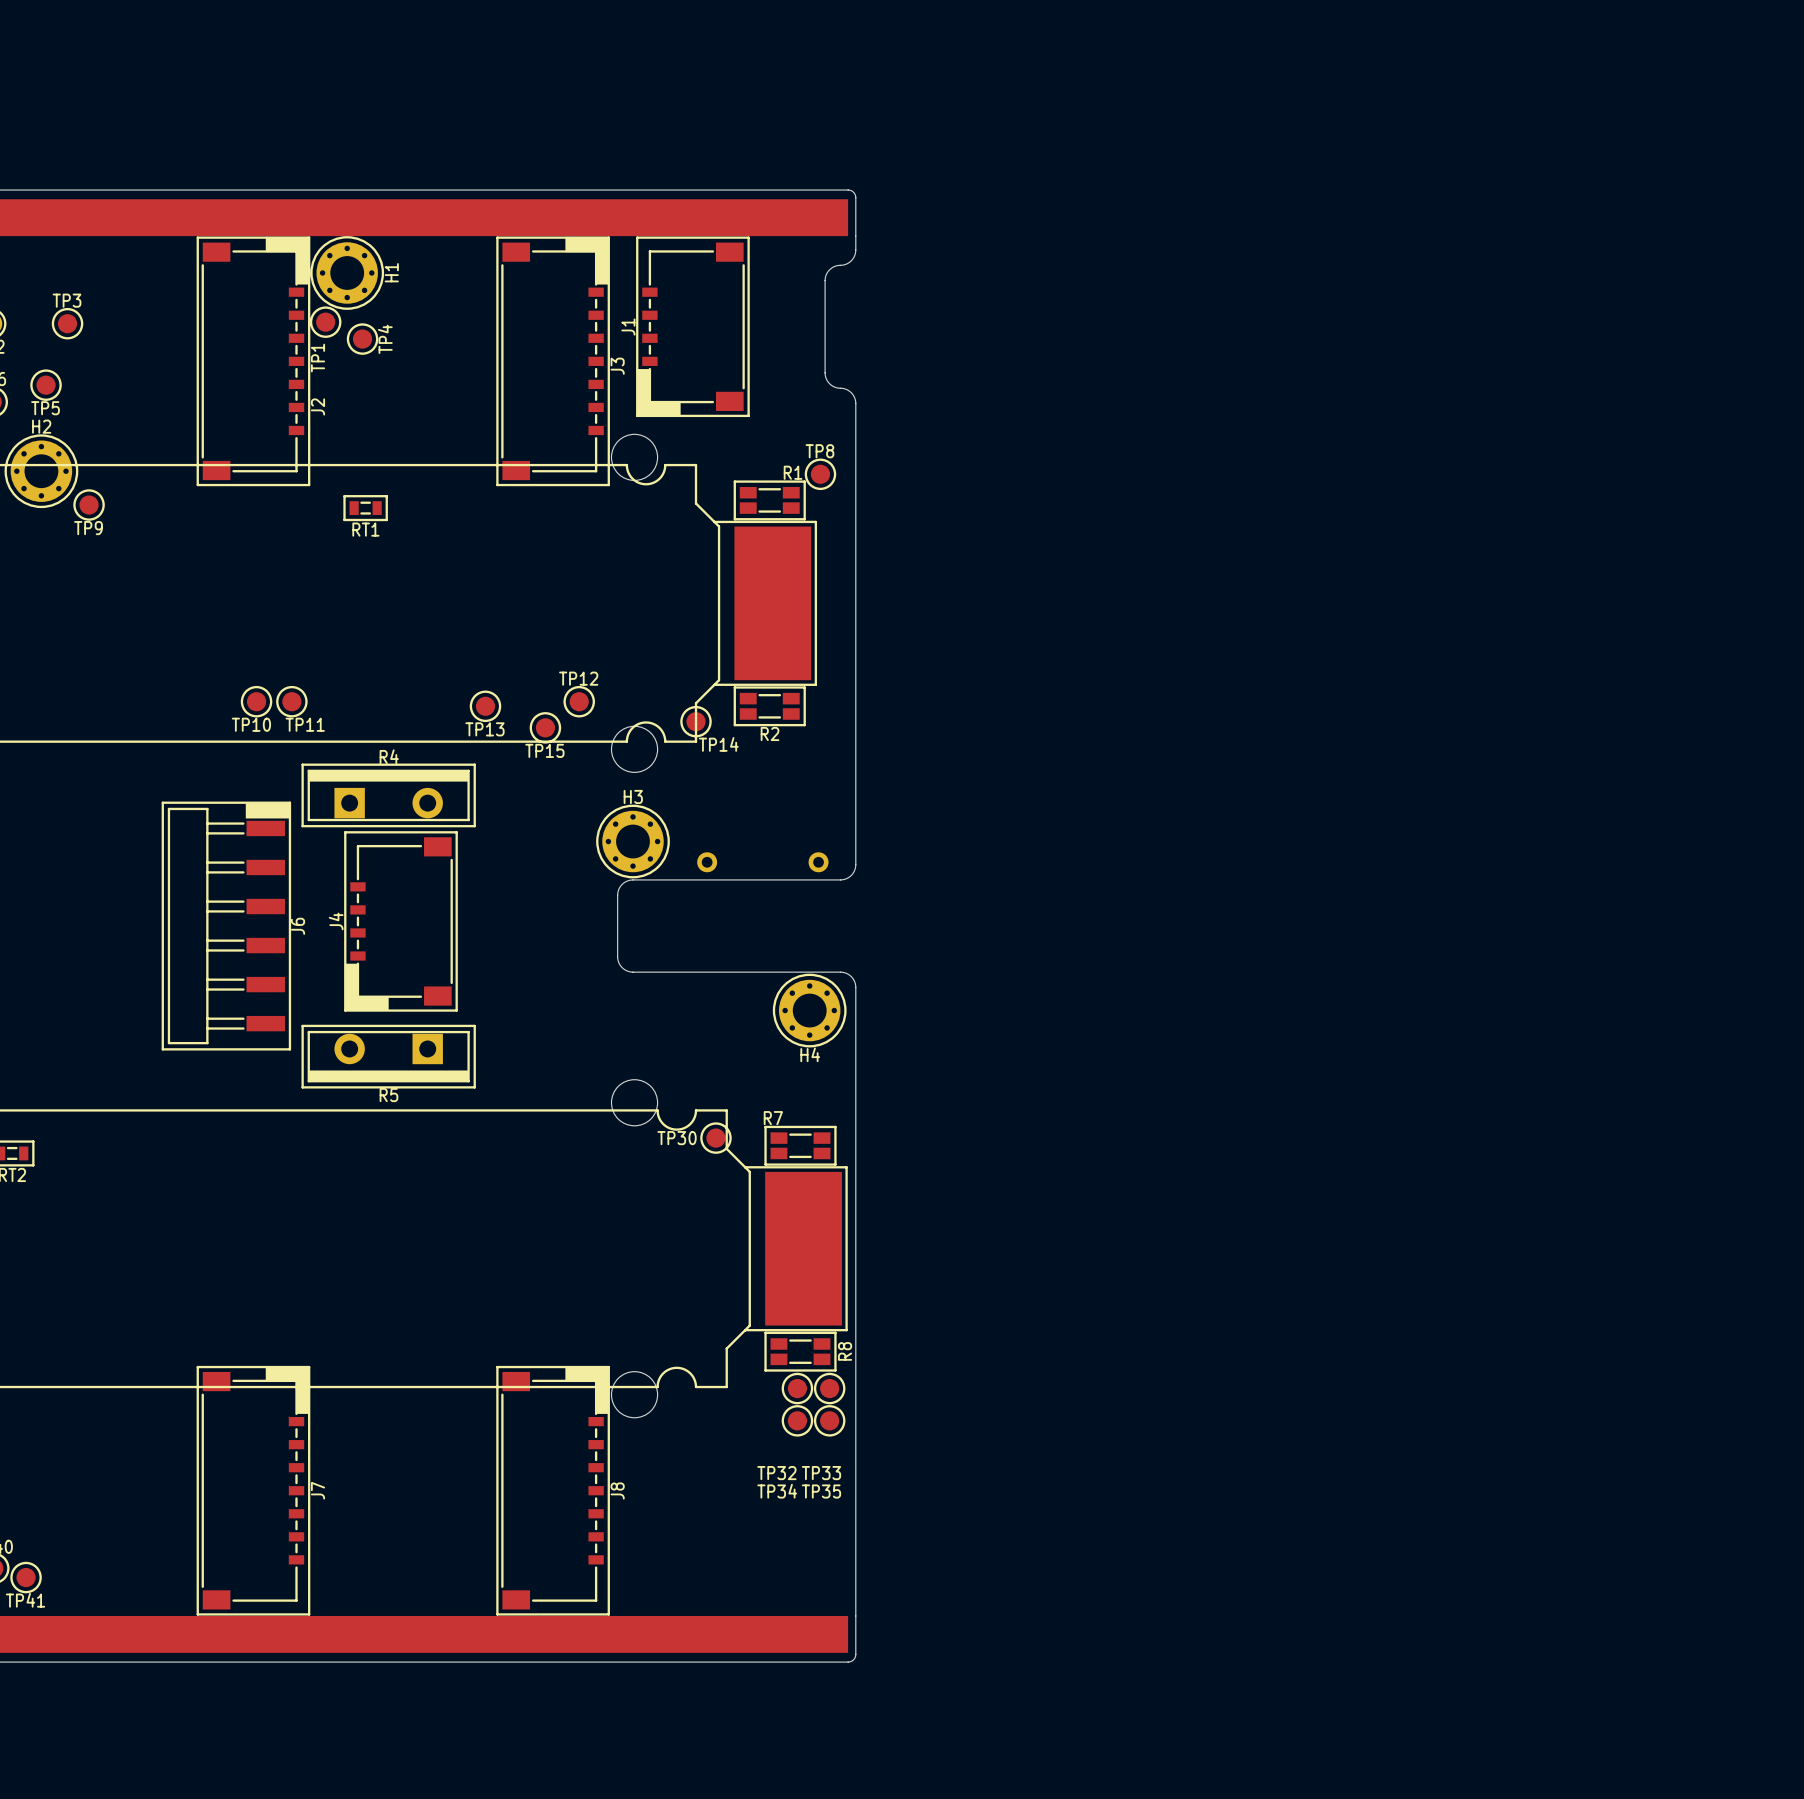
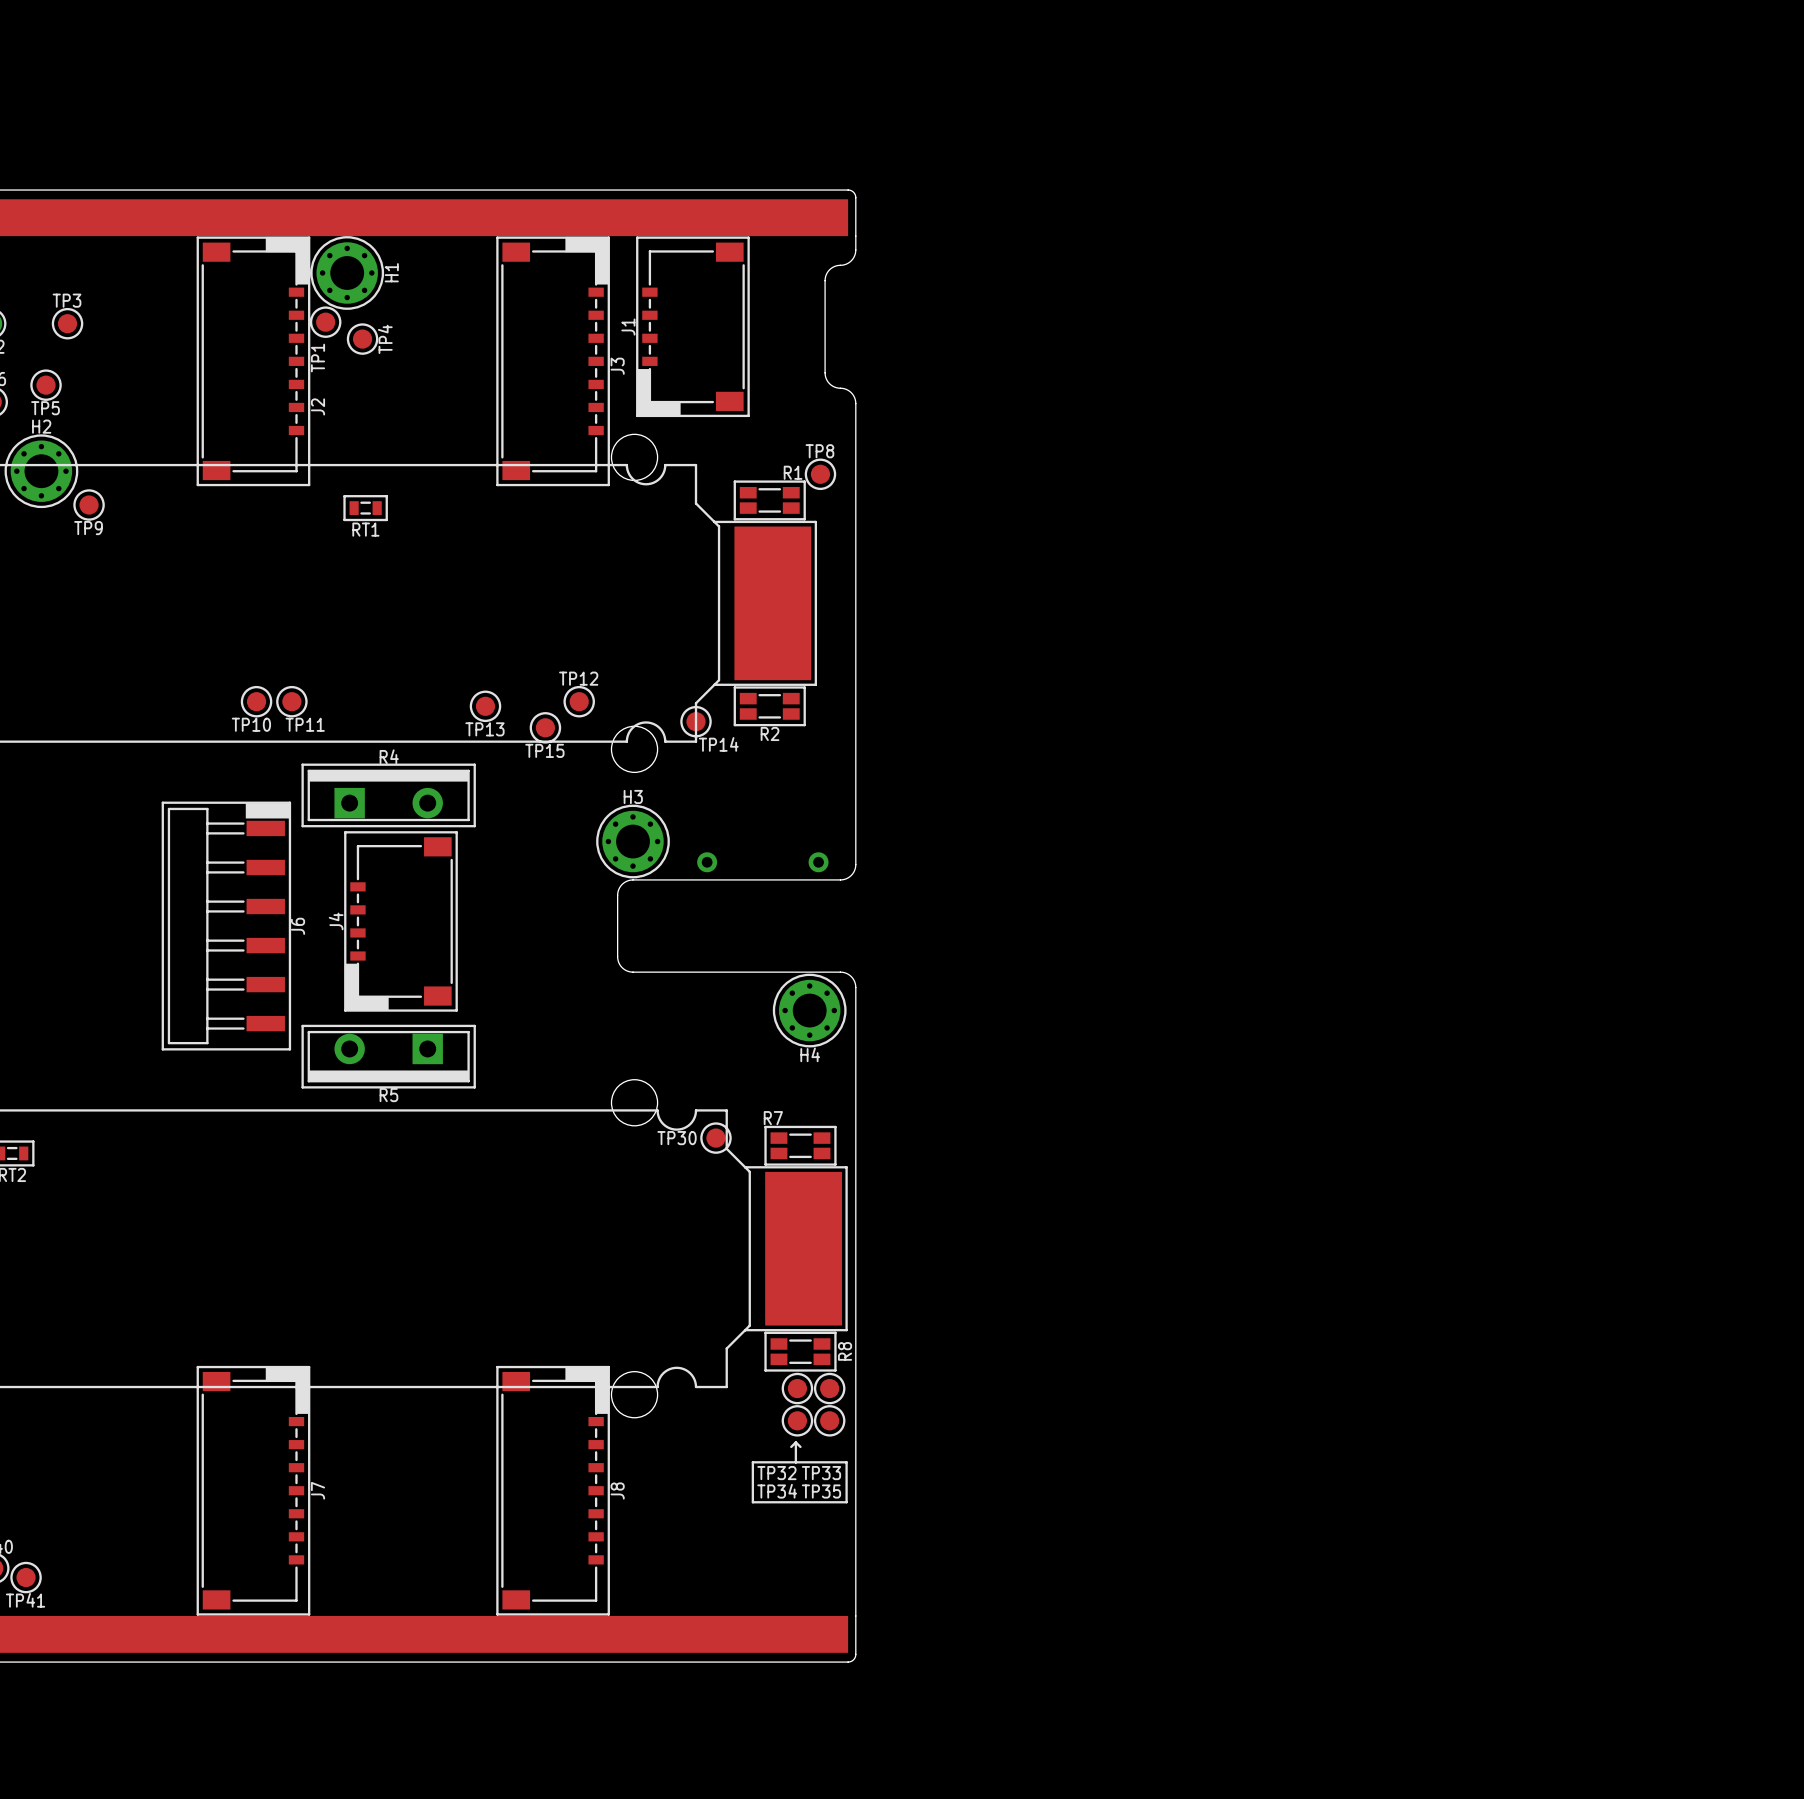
line: none -> (795, 1442) (795, 1462)
line: none -> (795, 1442) (791, 1446)
line: none -> (795, 1442) (800, 1446)
line: none -> (752, 1462) (752, 1502) (846, 1502) (846, 1462) (752, 1462)

